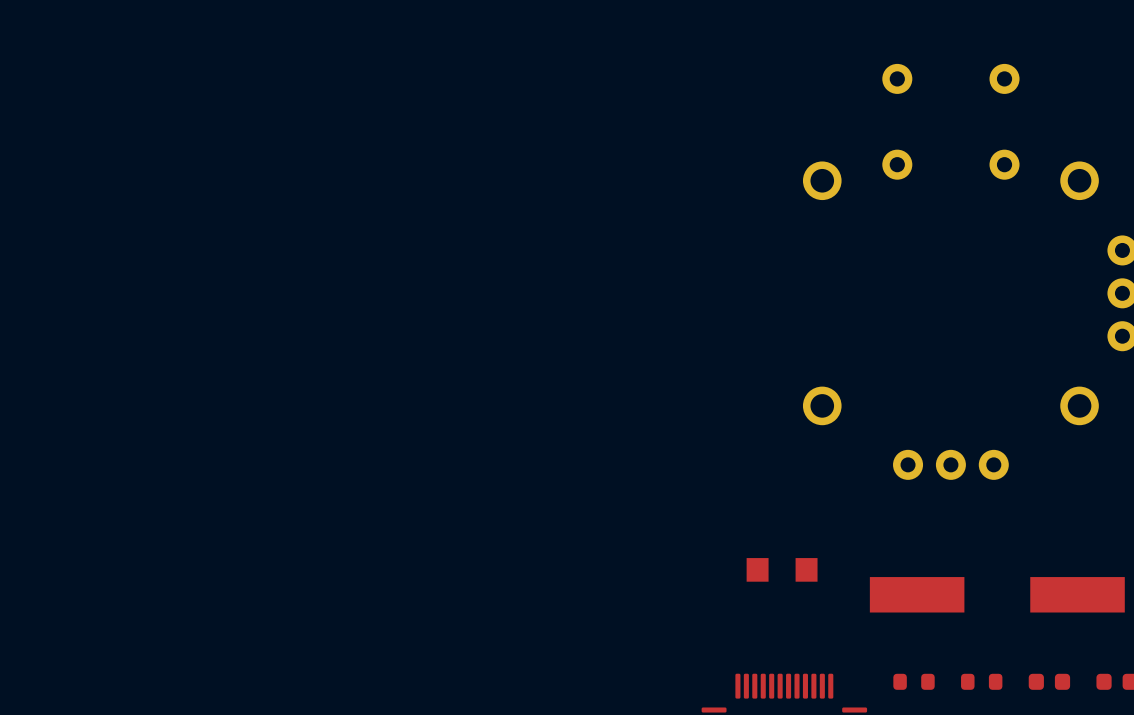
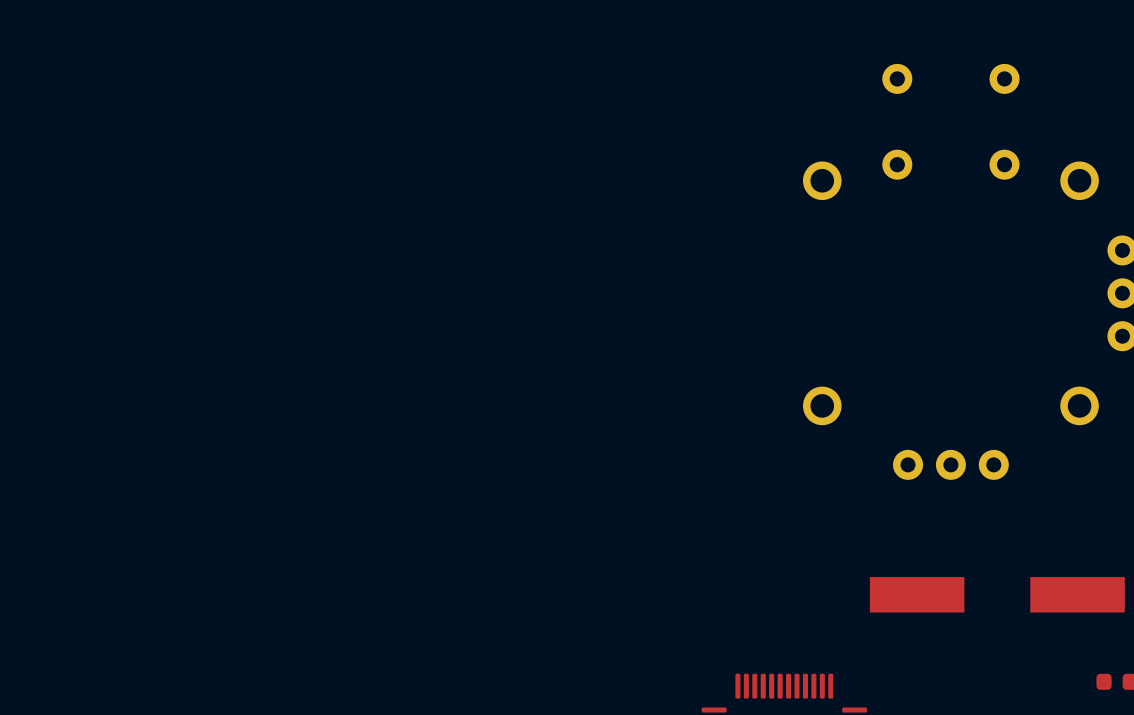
part: (782, 569) -> none
part: (914, 681) -> none
part: (981, 681) -> none
part: (1049, 681) -> none

